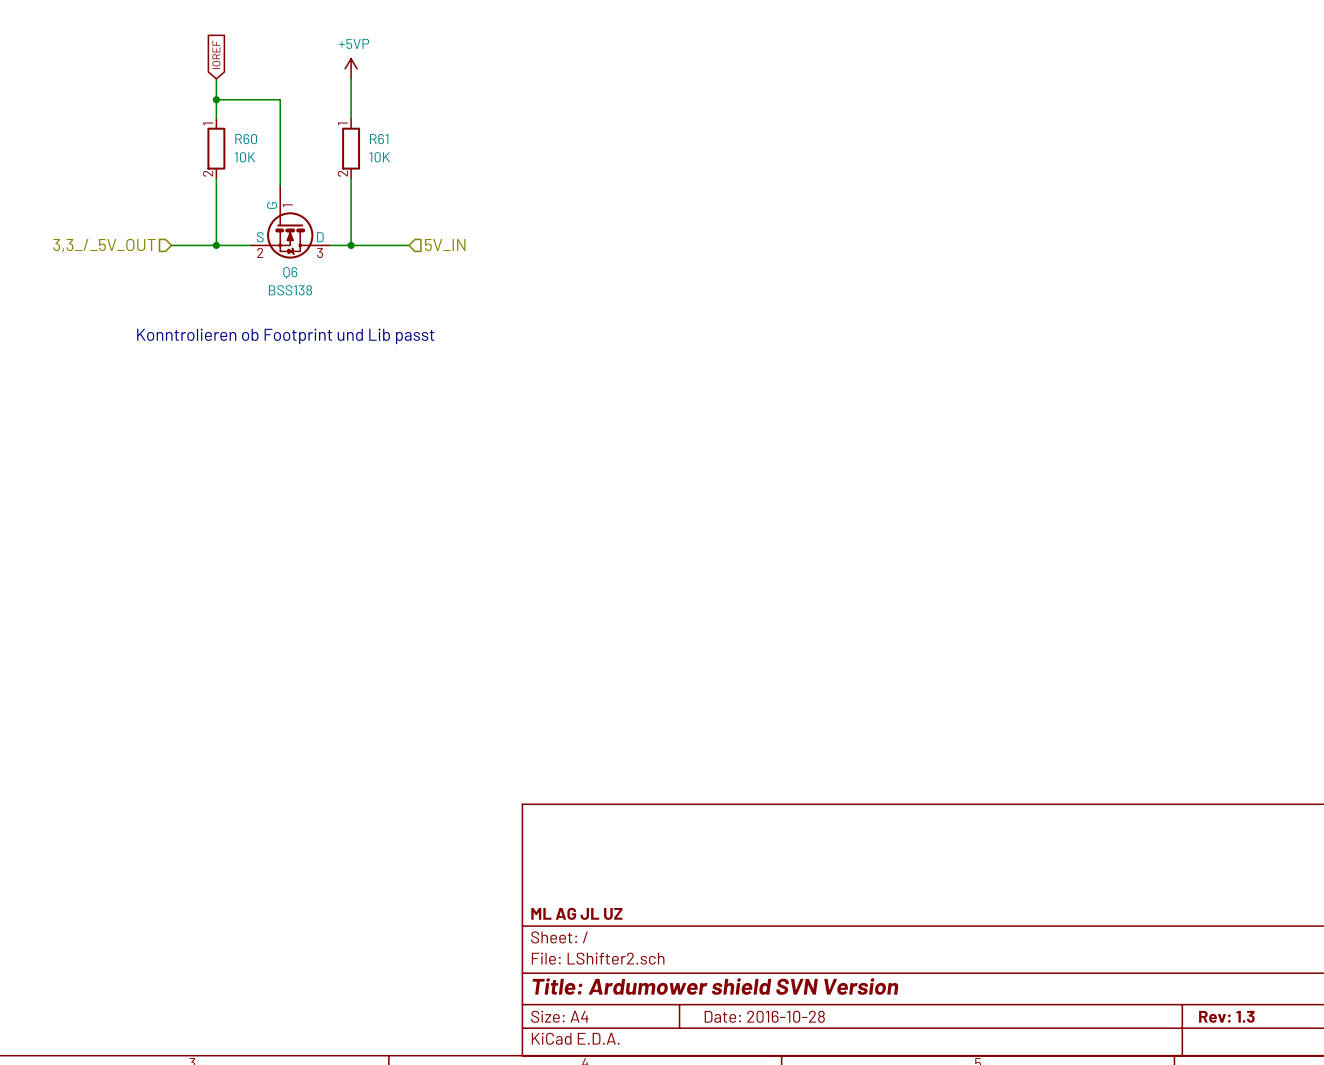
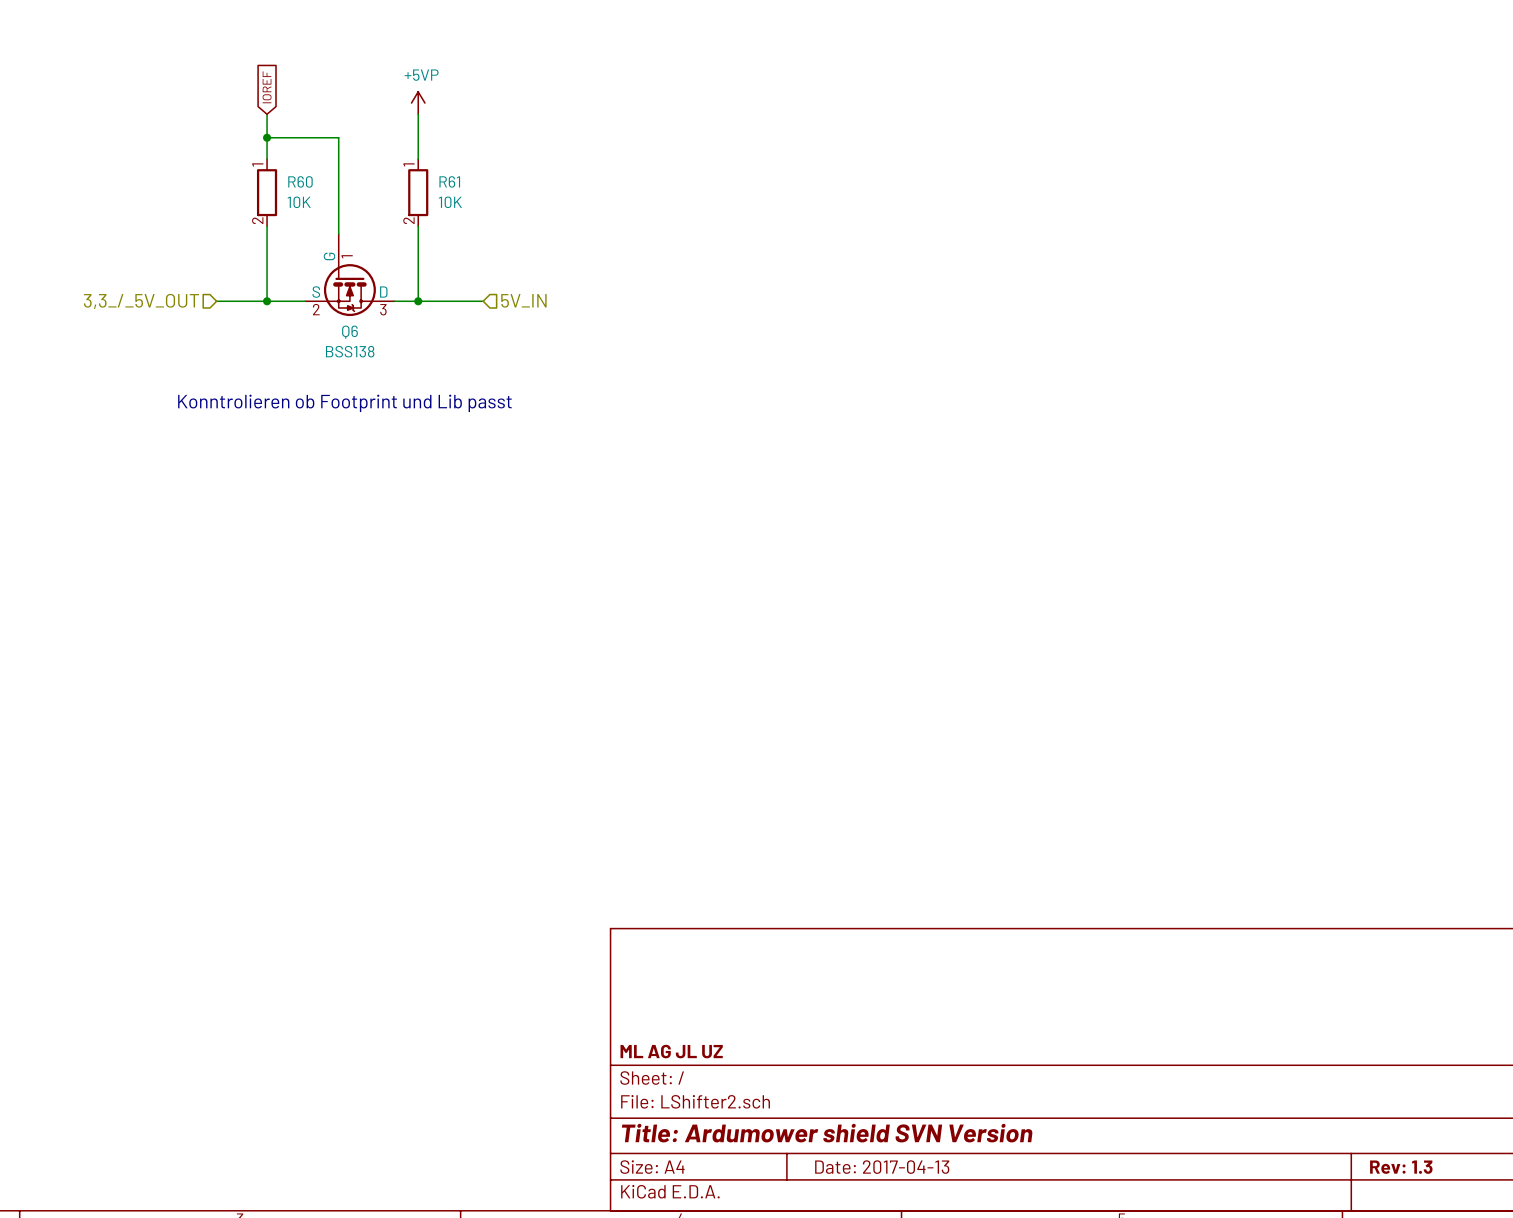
title block: Date: 2016-10-28 (764, 1016) -> Date: 2017-04-13 (882, 1167)

